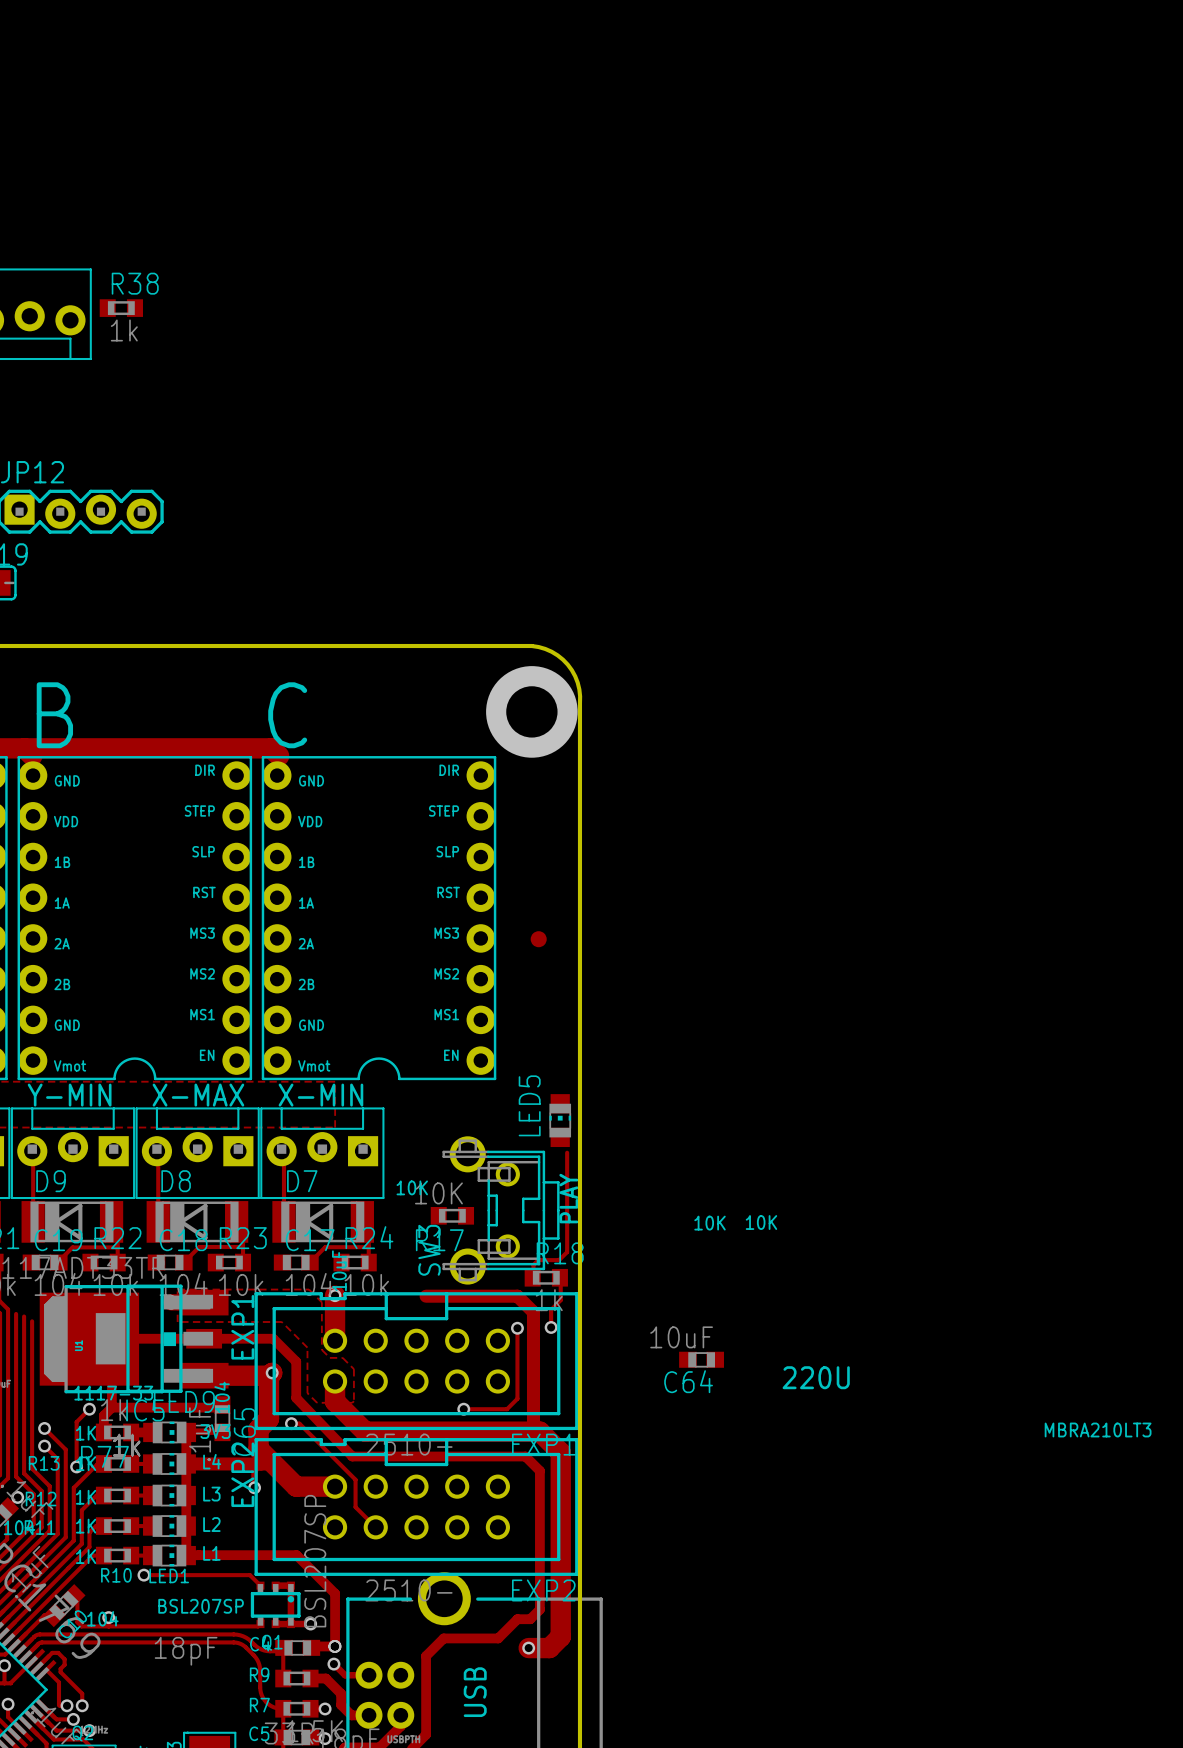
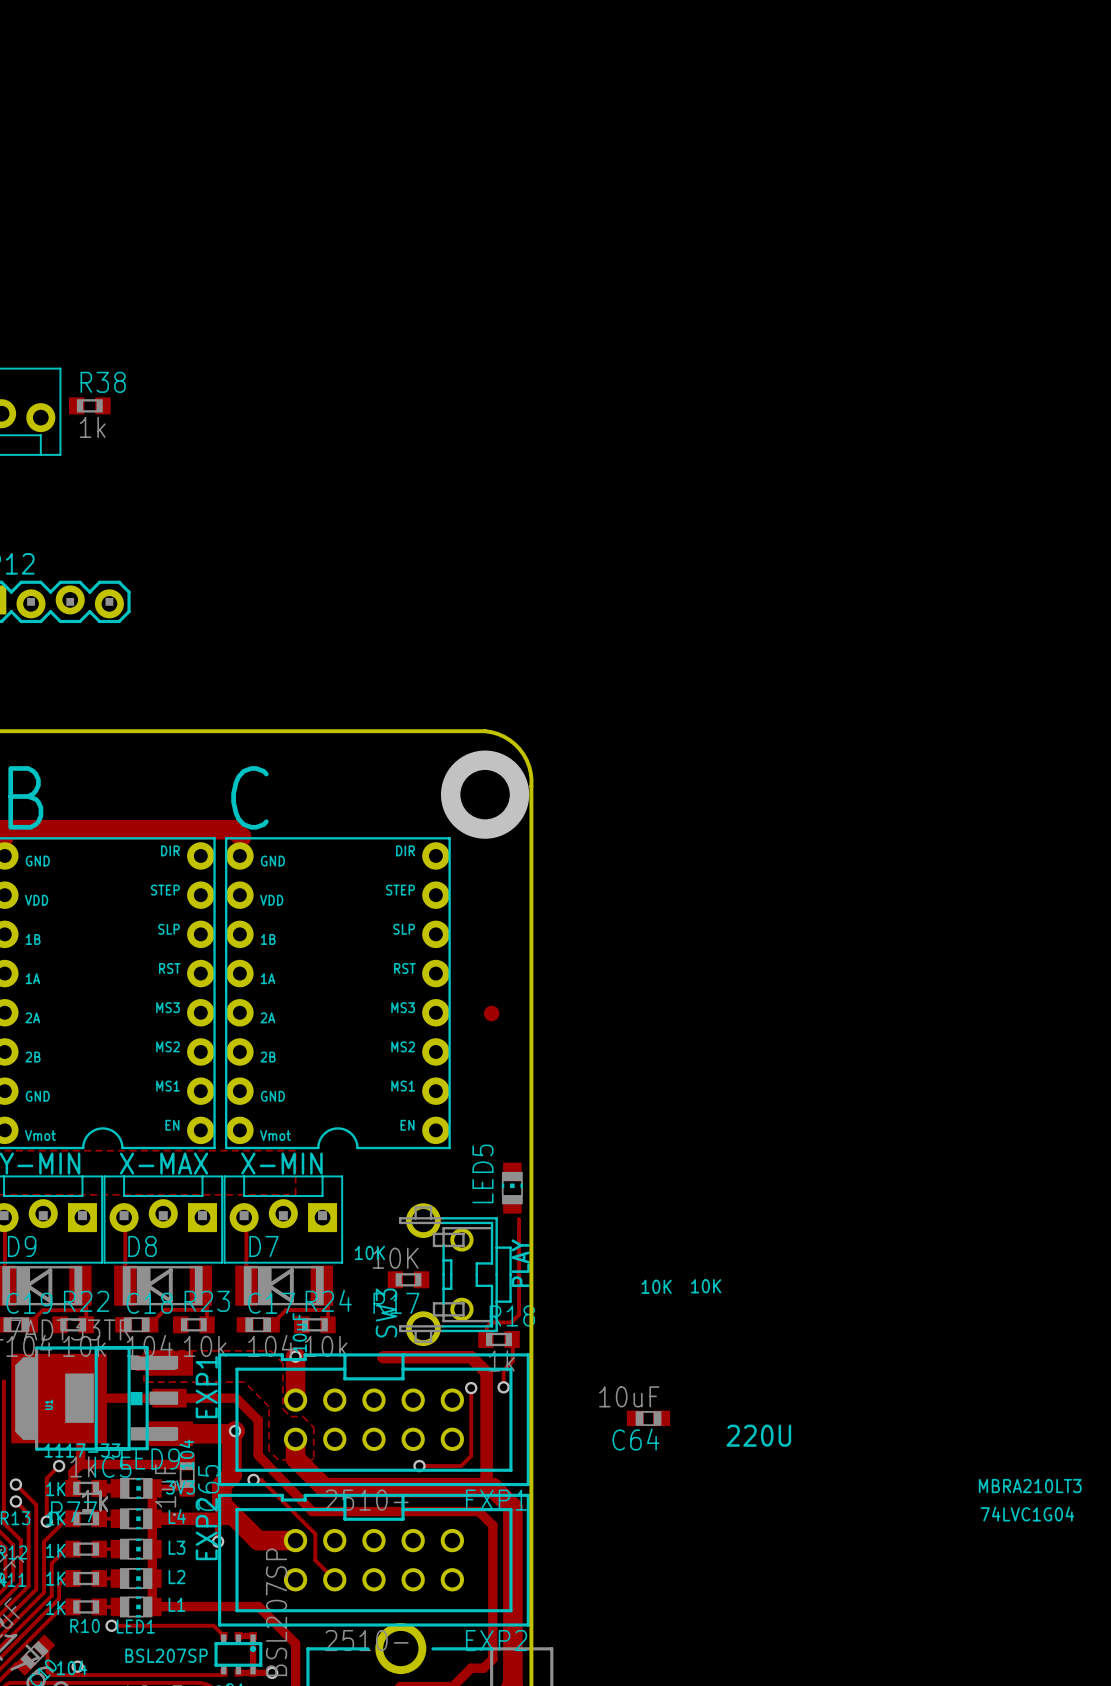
text: none -> 74LVC1G04 (1027, 1514)

